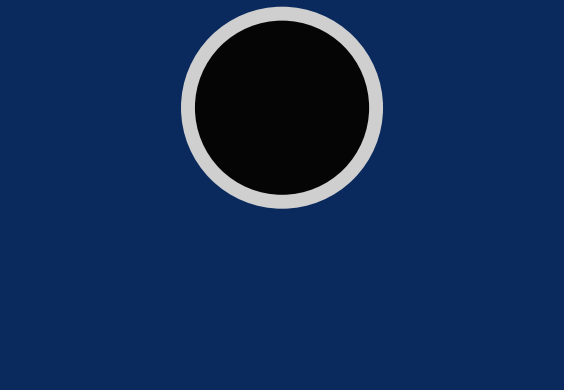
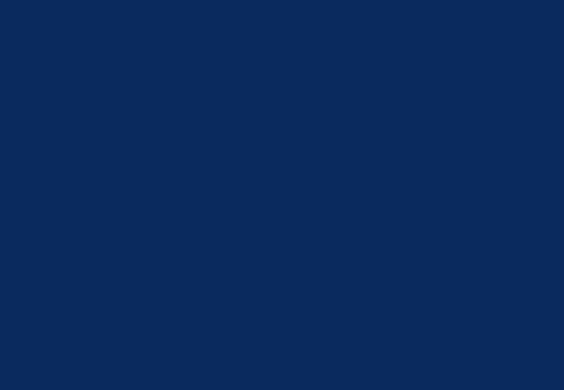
part: (282, 107) -> none

